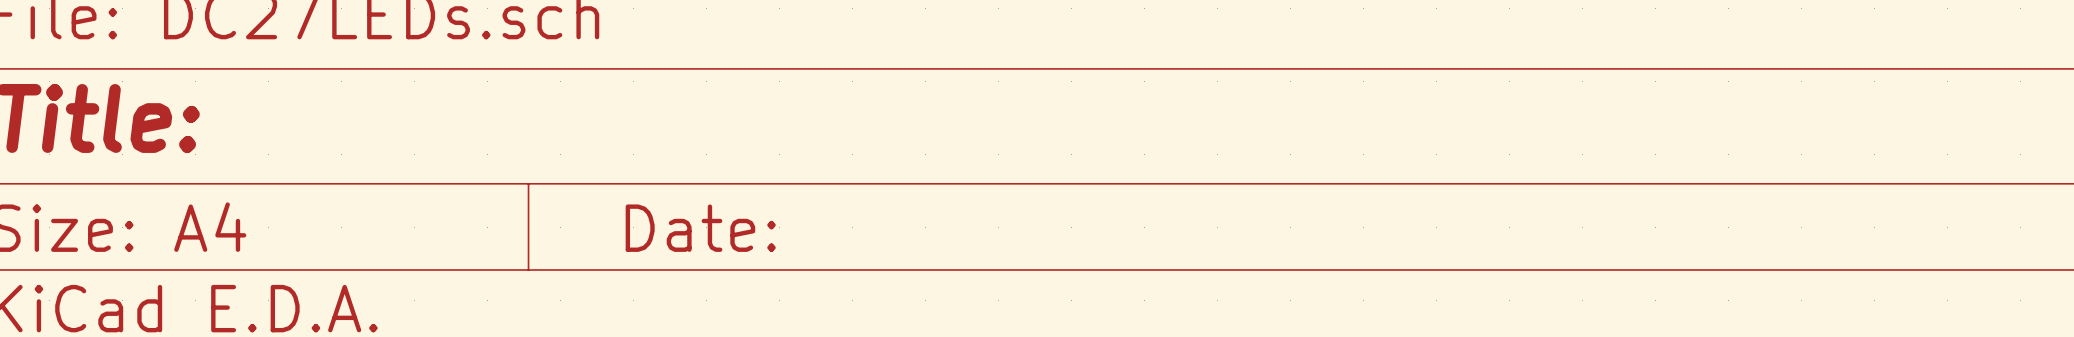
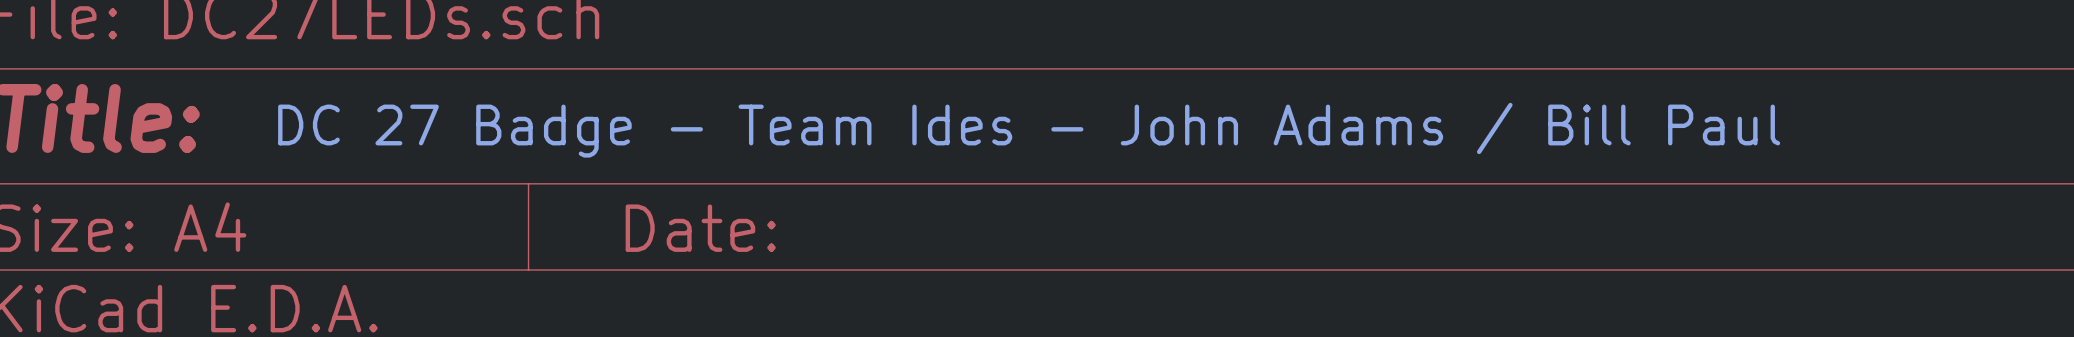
text: none -> DC 27 Badge - Team Ides - John Adams / Bill Paul (1029, 130)

